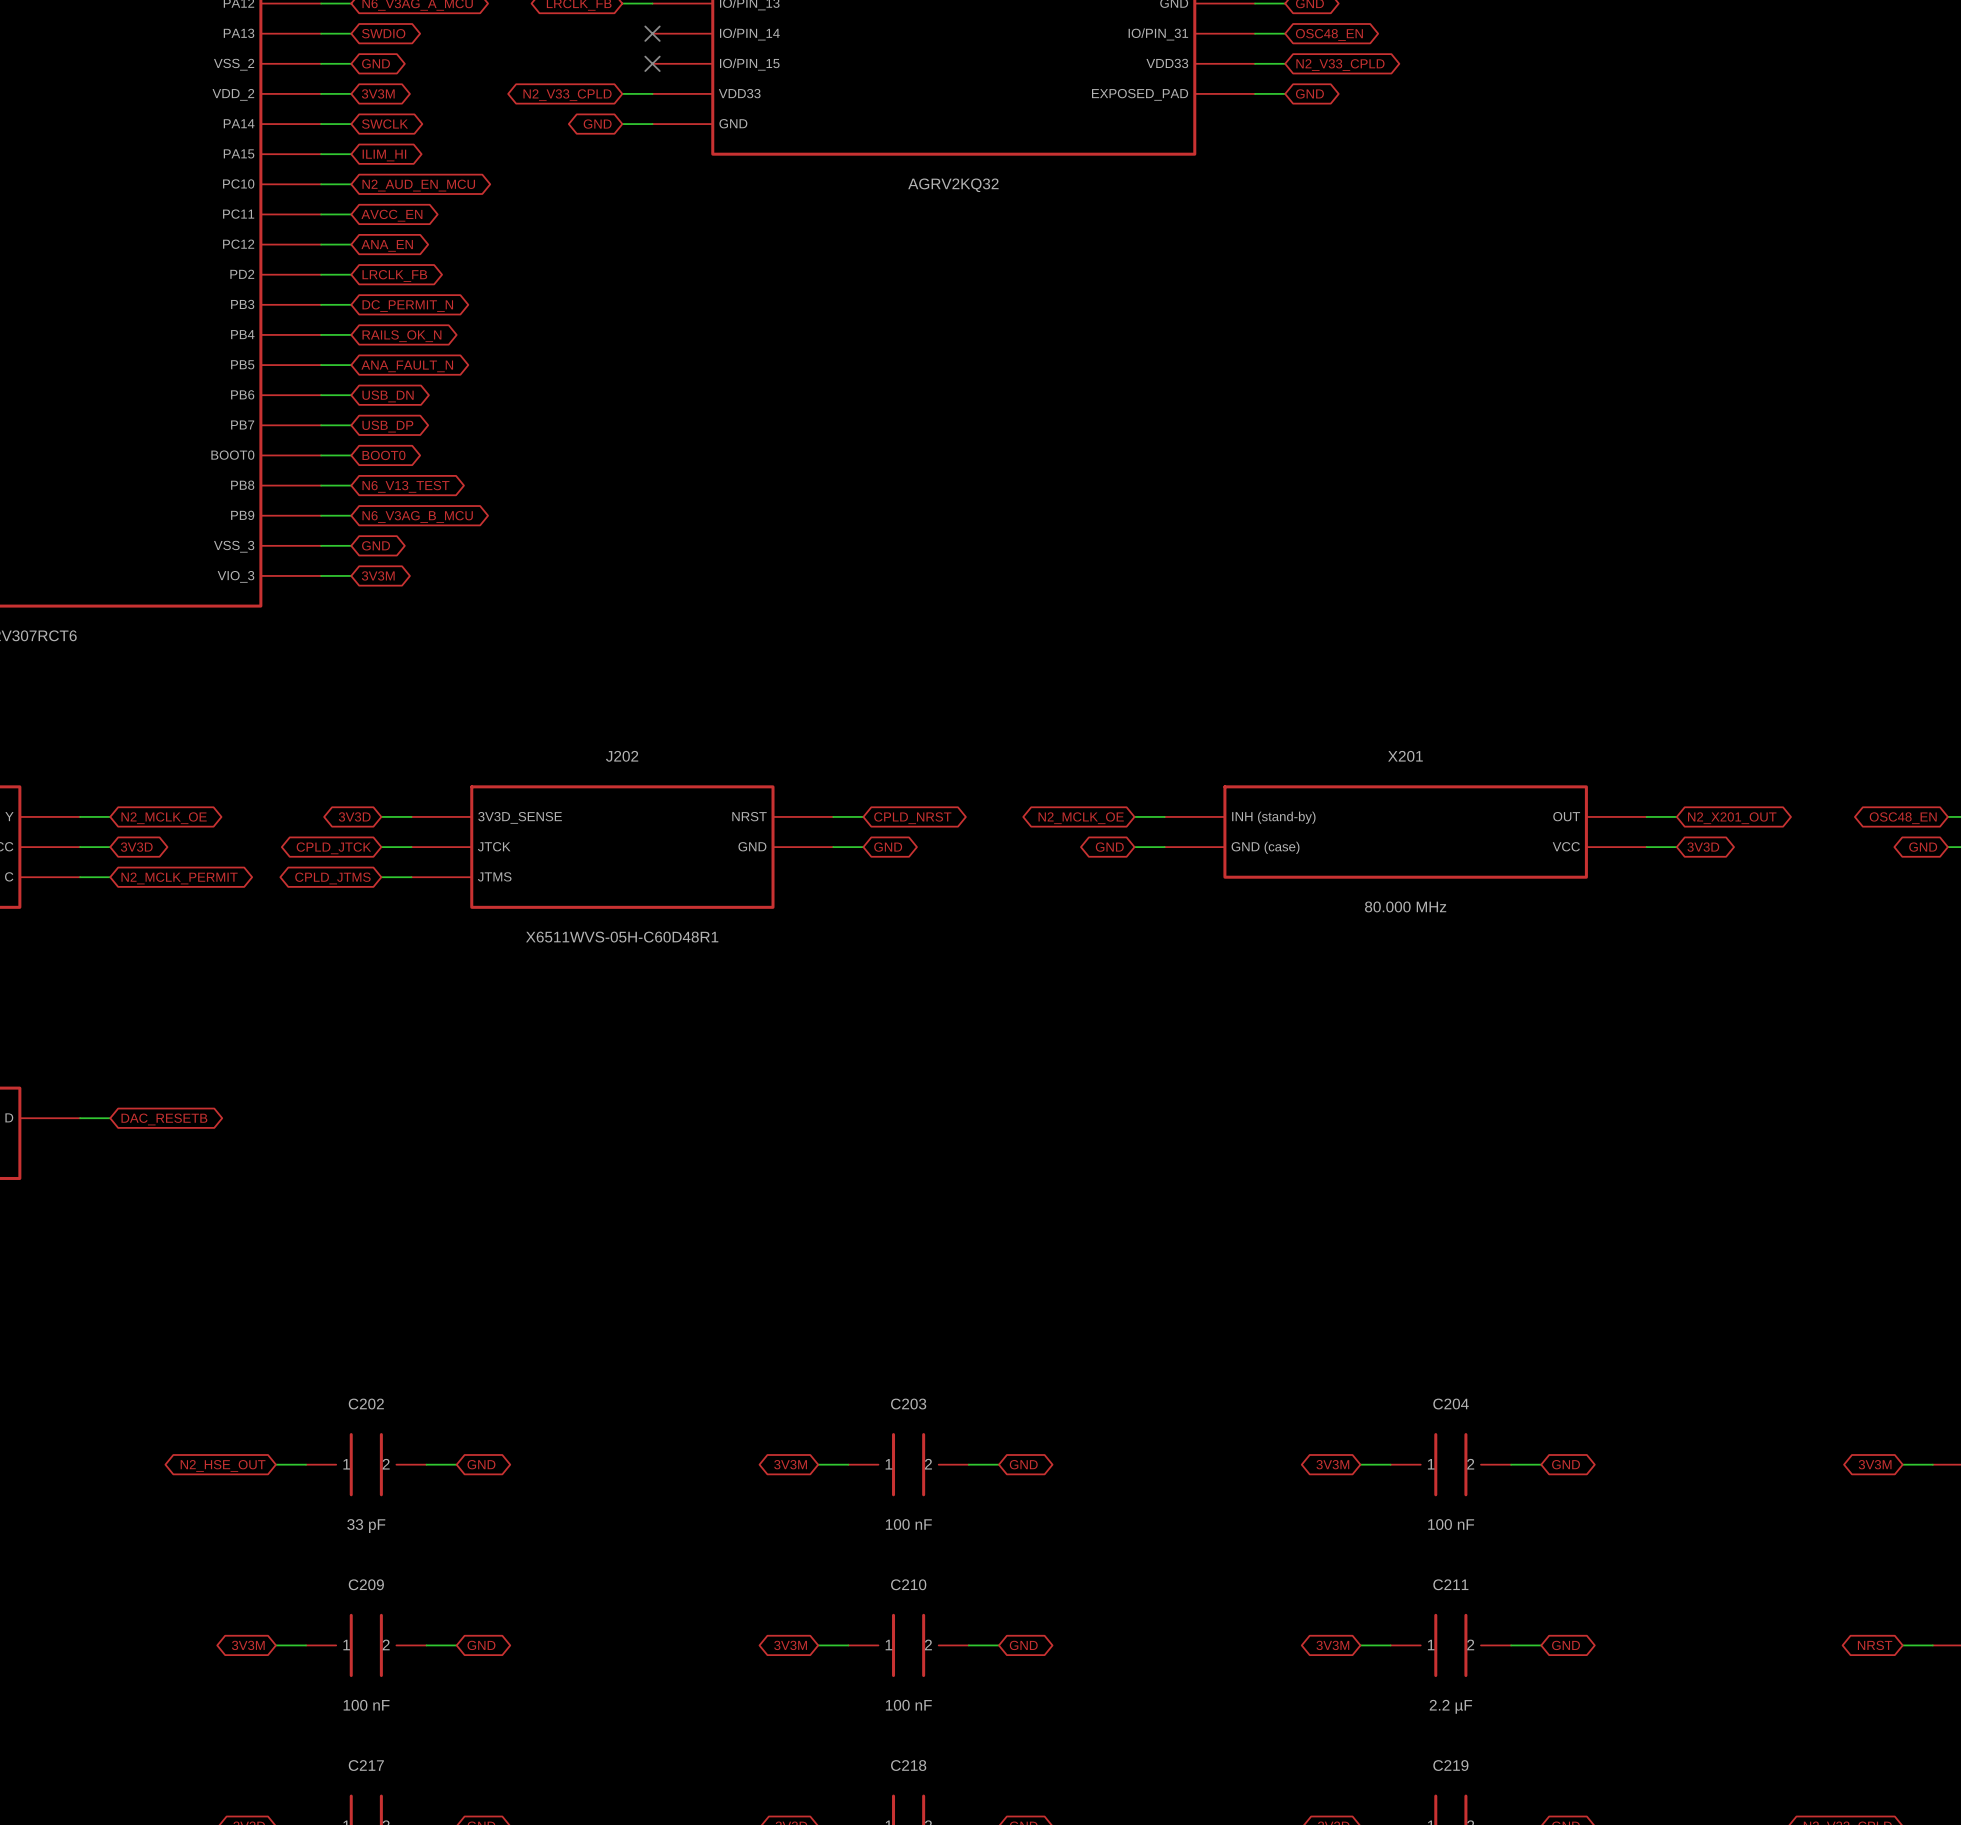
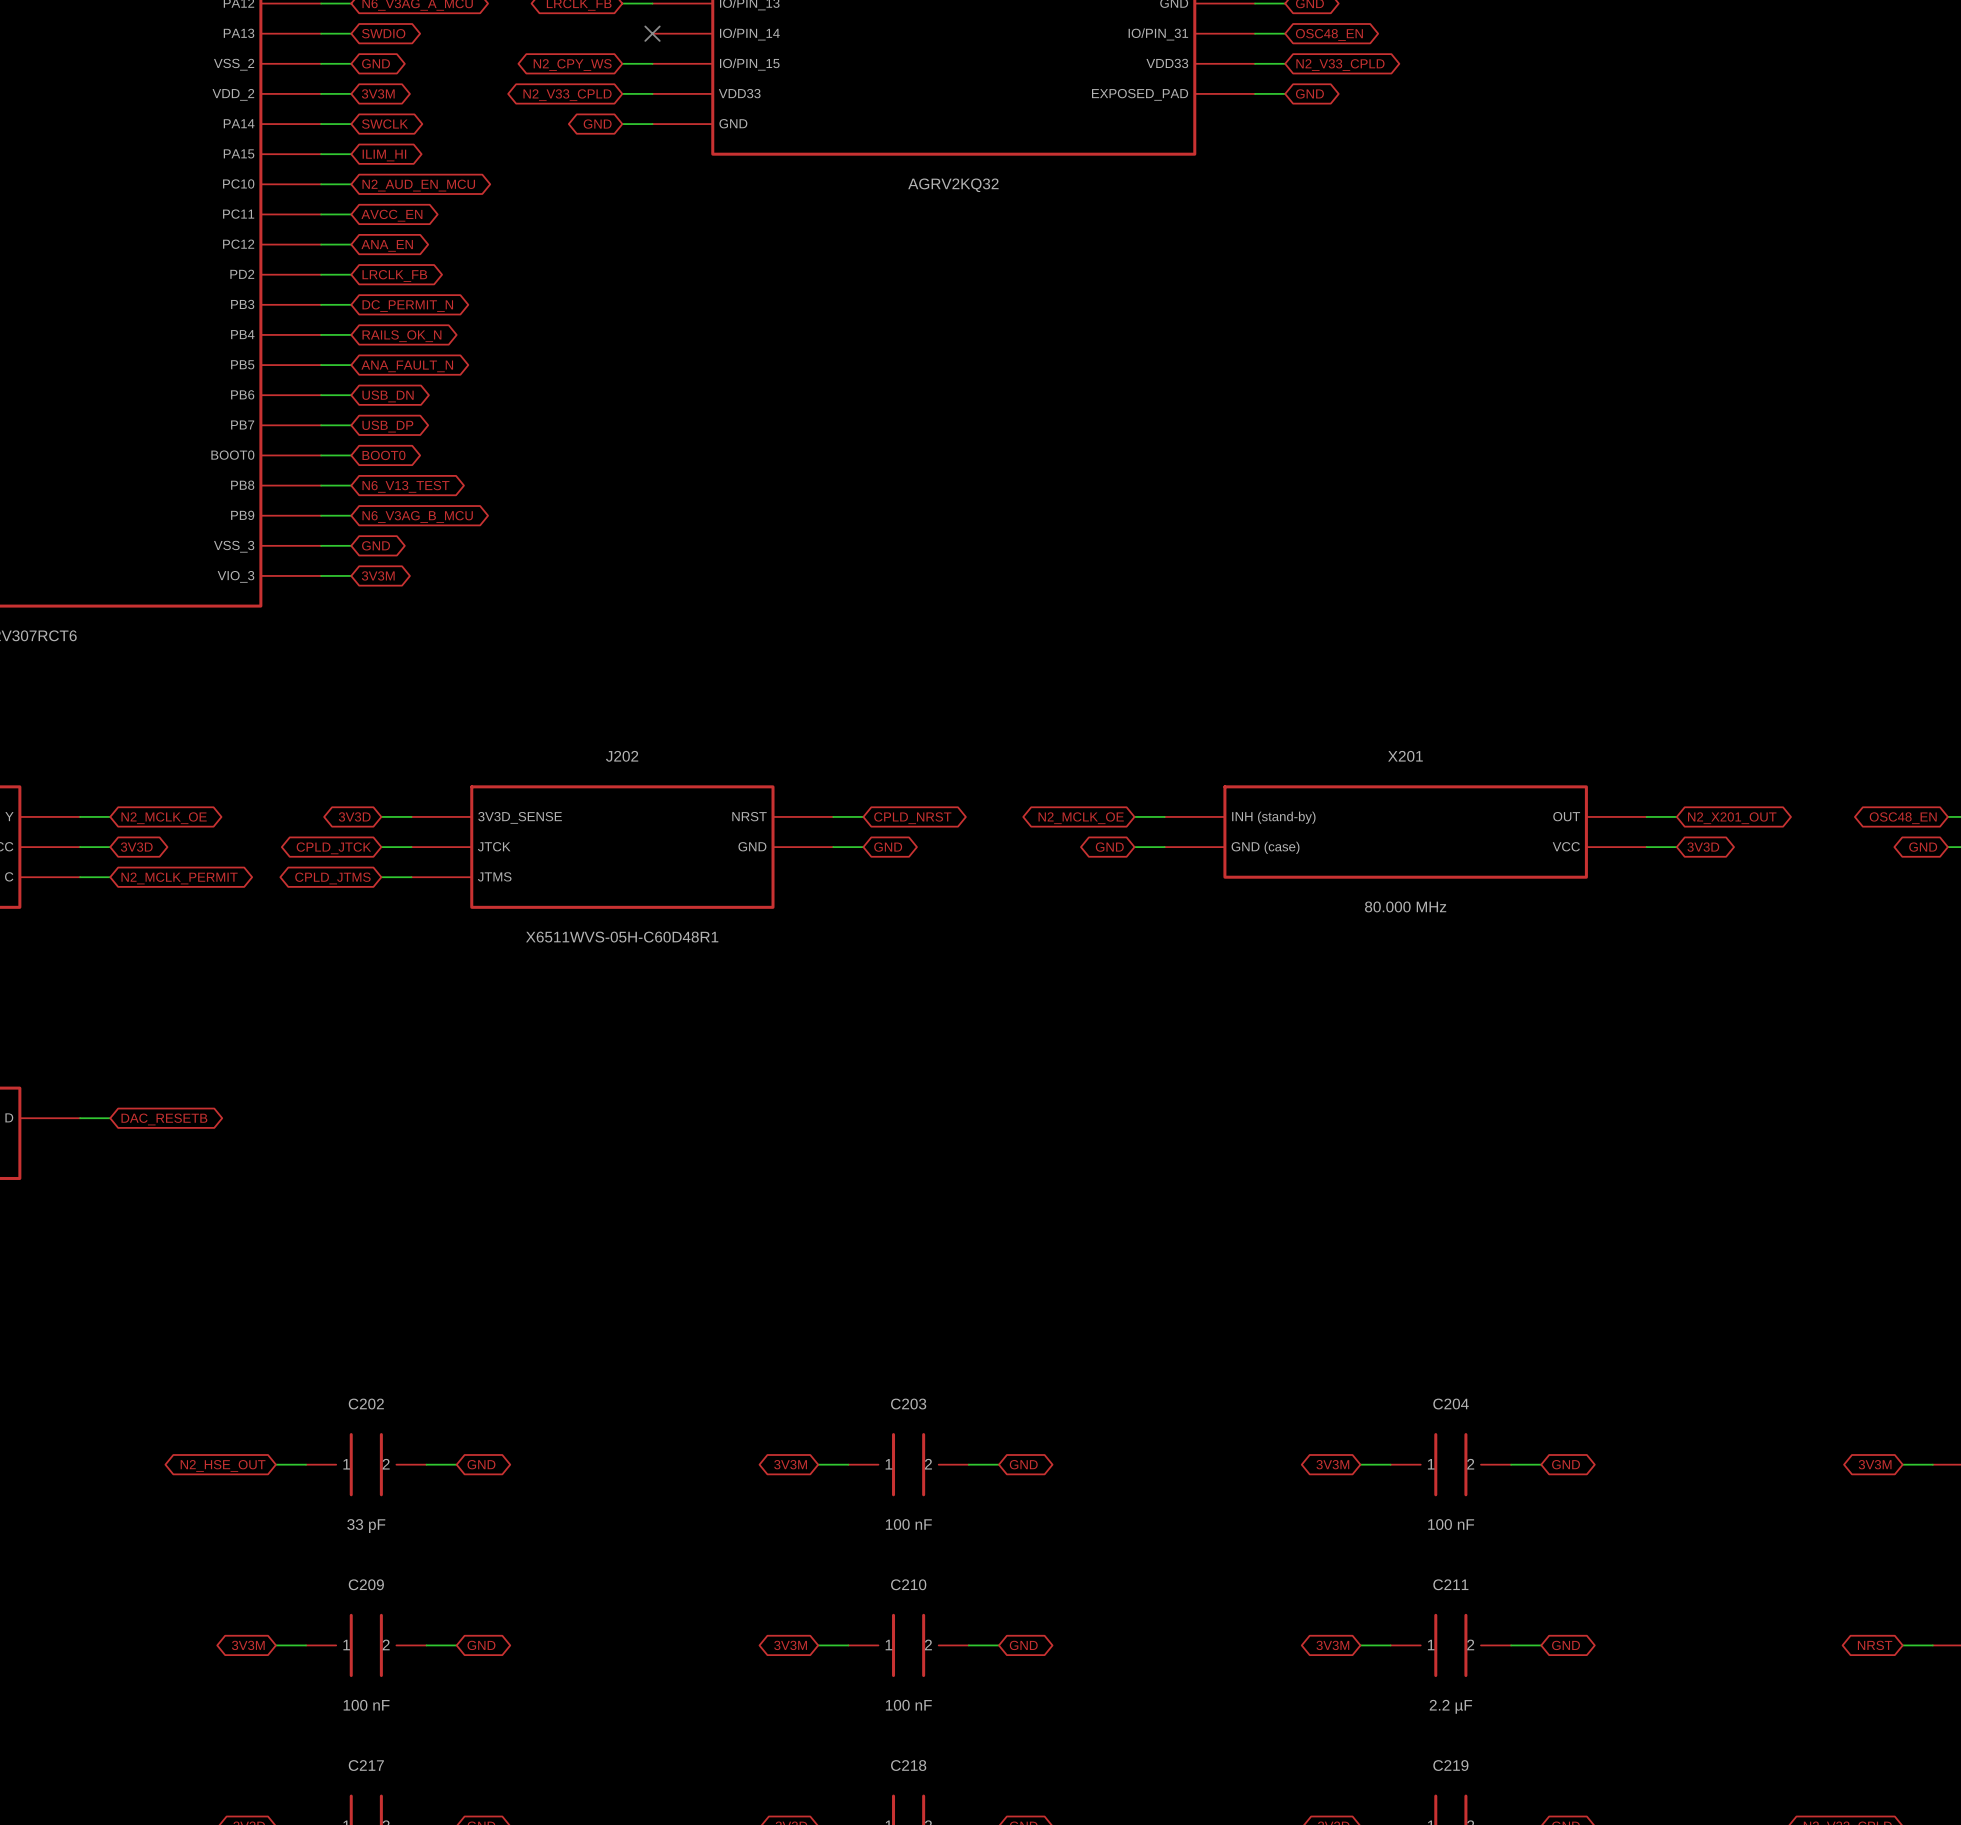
wire: none -> (622, 63) (652, 63)
no-connect mark: (652, 63) -> none
global label: none -> N2_CPY_WS (572, 65)

